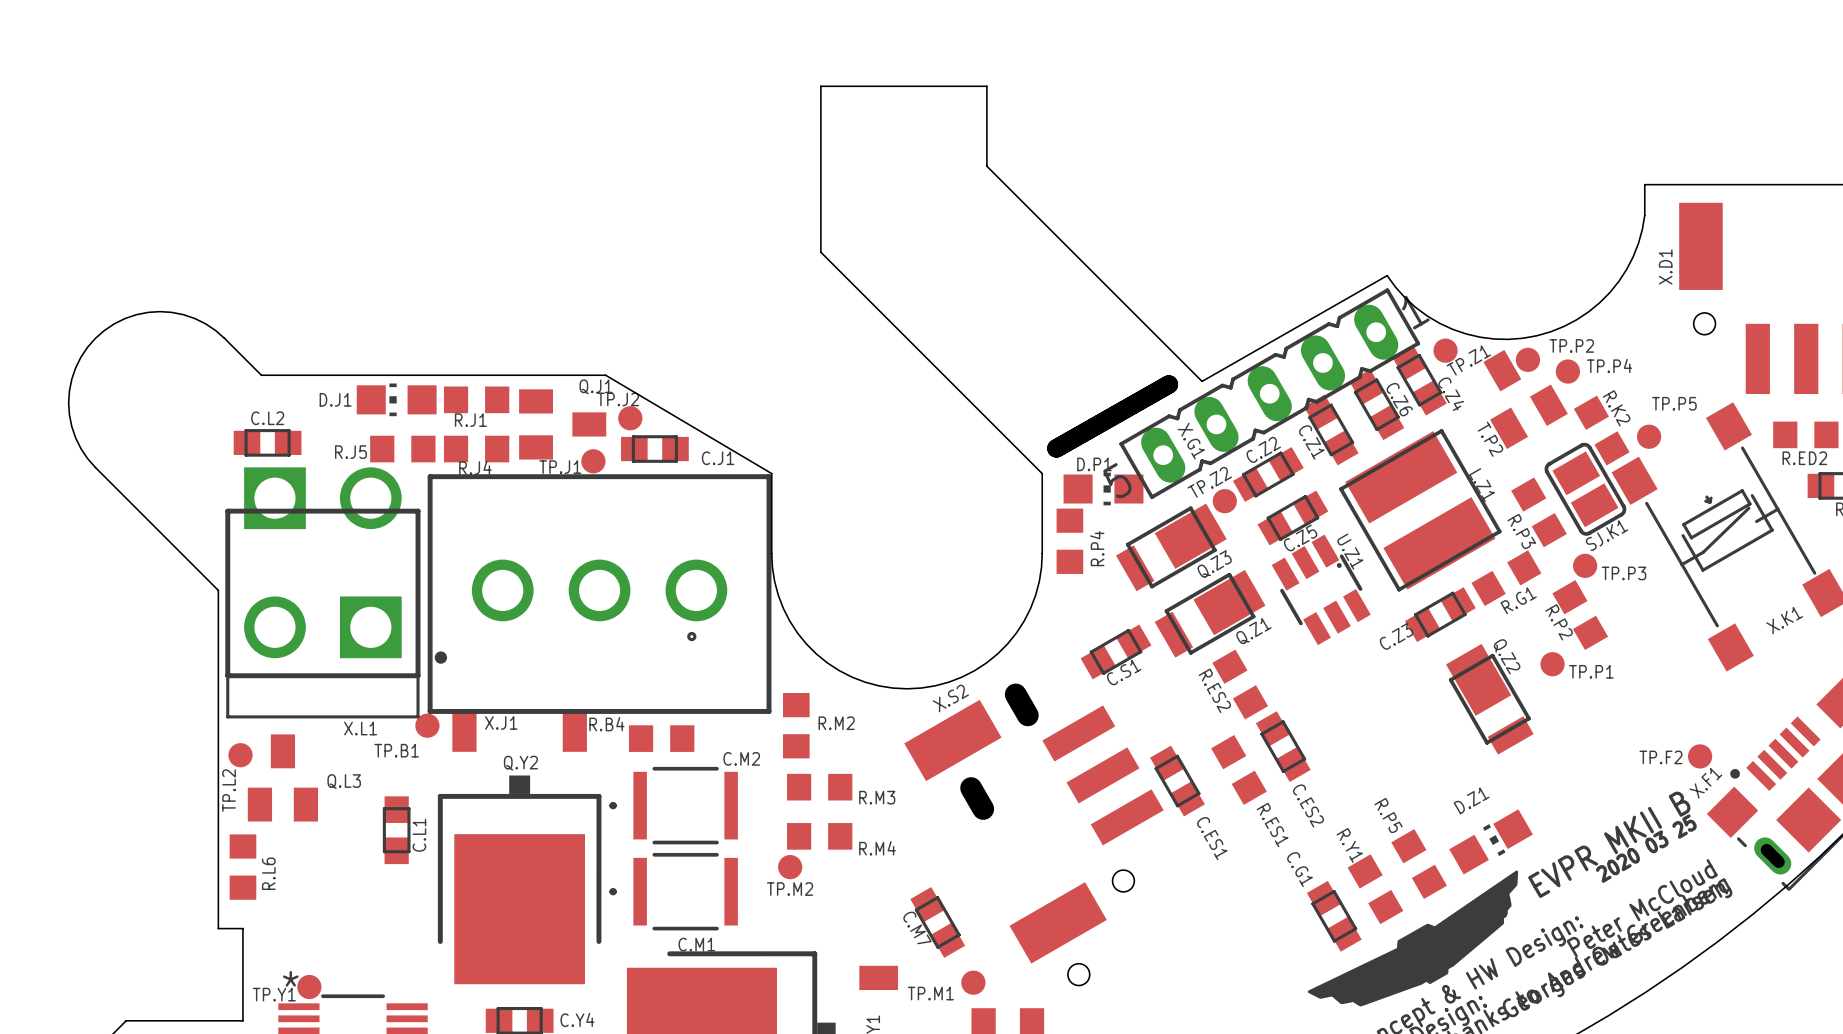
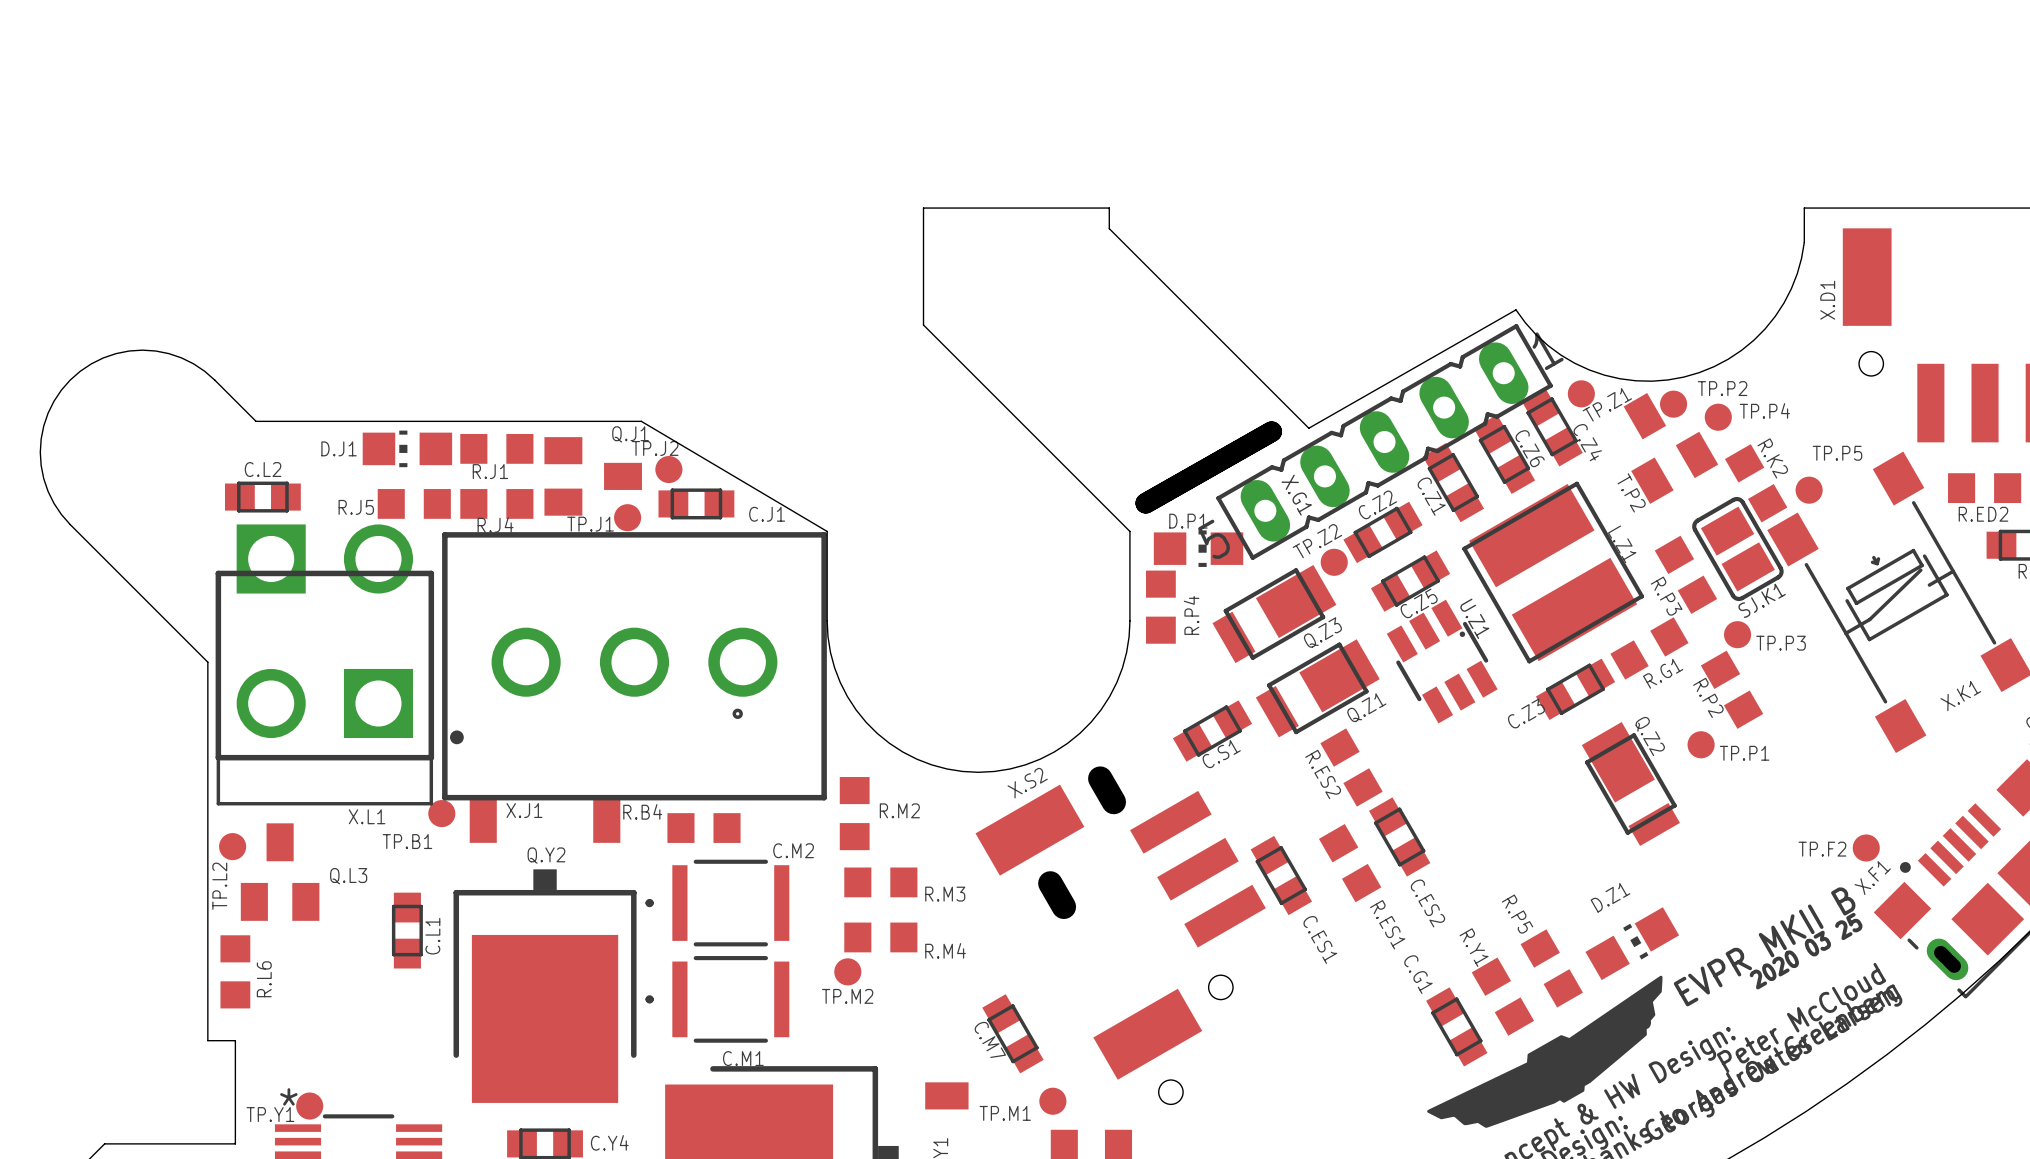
board edge: (1023, 203) (986, 166) (986, 86) (820, 86) (820, 252) (857, 289) -> (1109, 228) (1109, 208) (923, 208) (923, 325)

